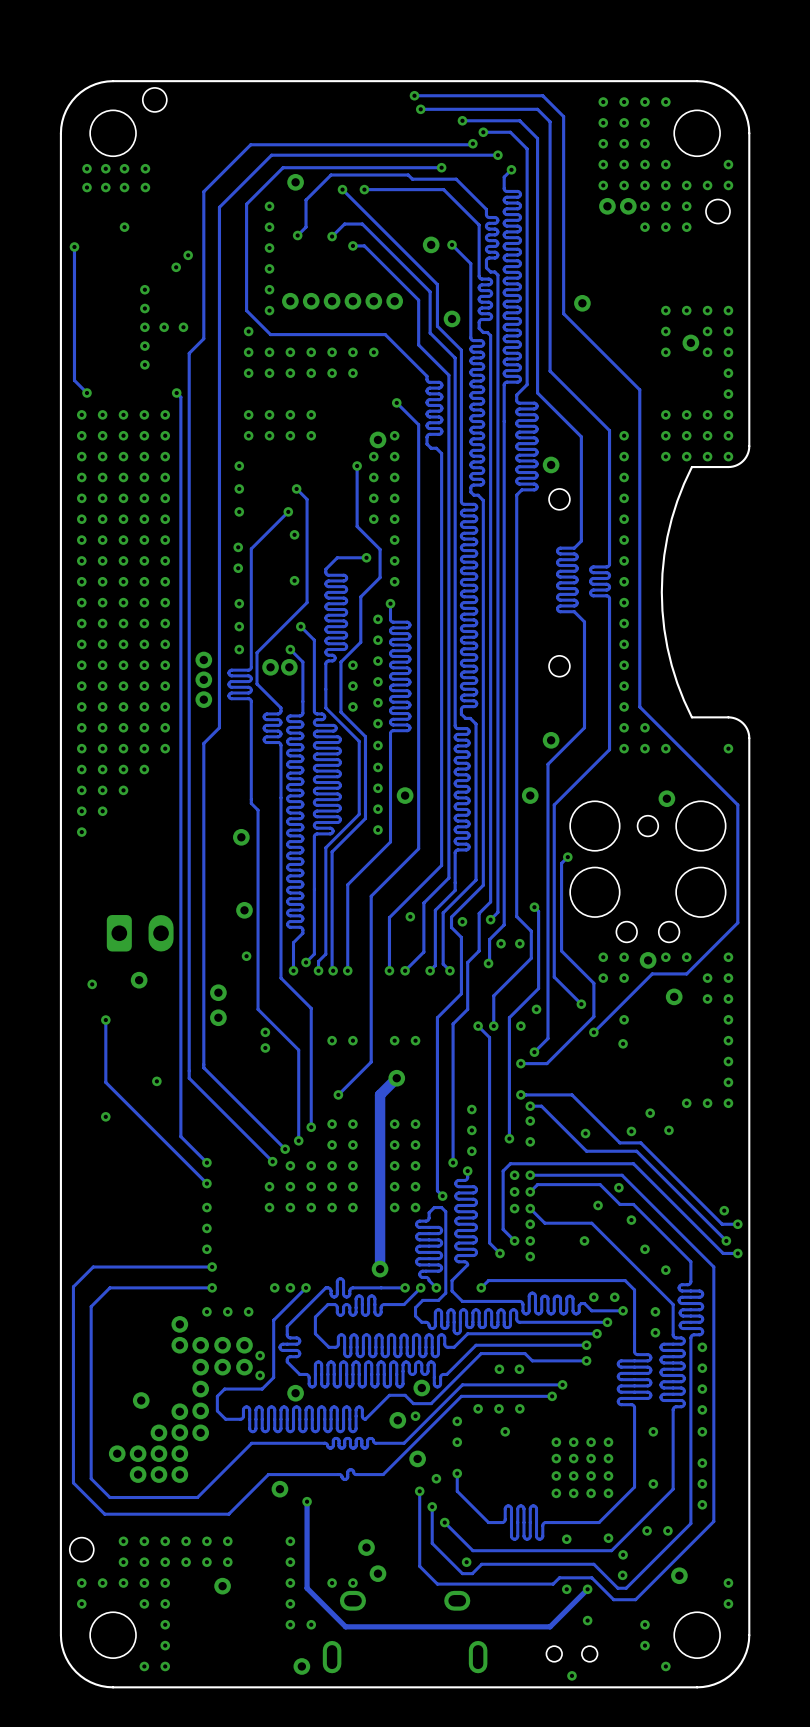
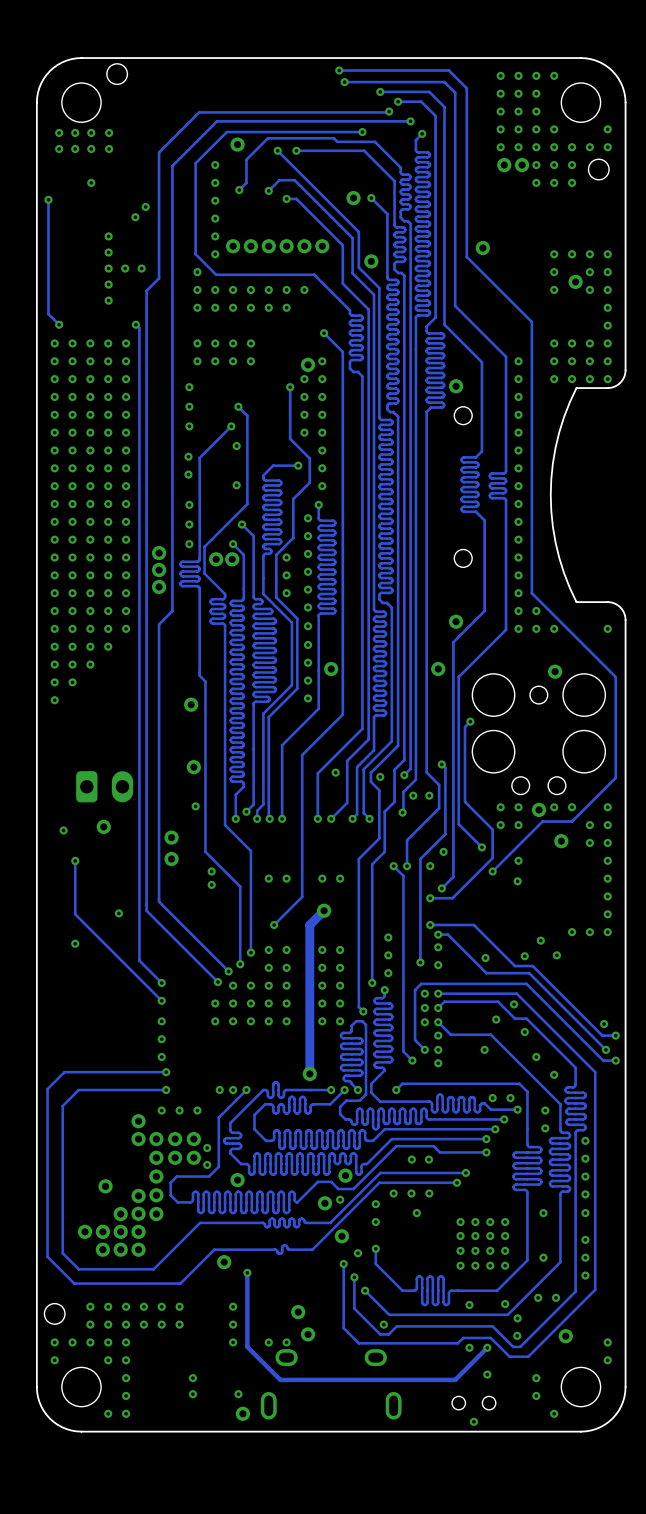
via: (222, 1586) -> none
via: (290, 1603) -> none
via: none -> (192, 1378)
via: (290, 1624) -> none
via: (311, 1624) -> none
via: none -> (192, 1394)
via: none -> (238, 1394)

